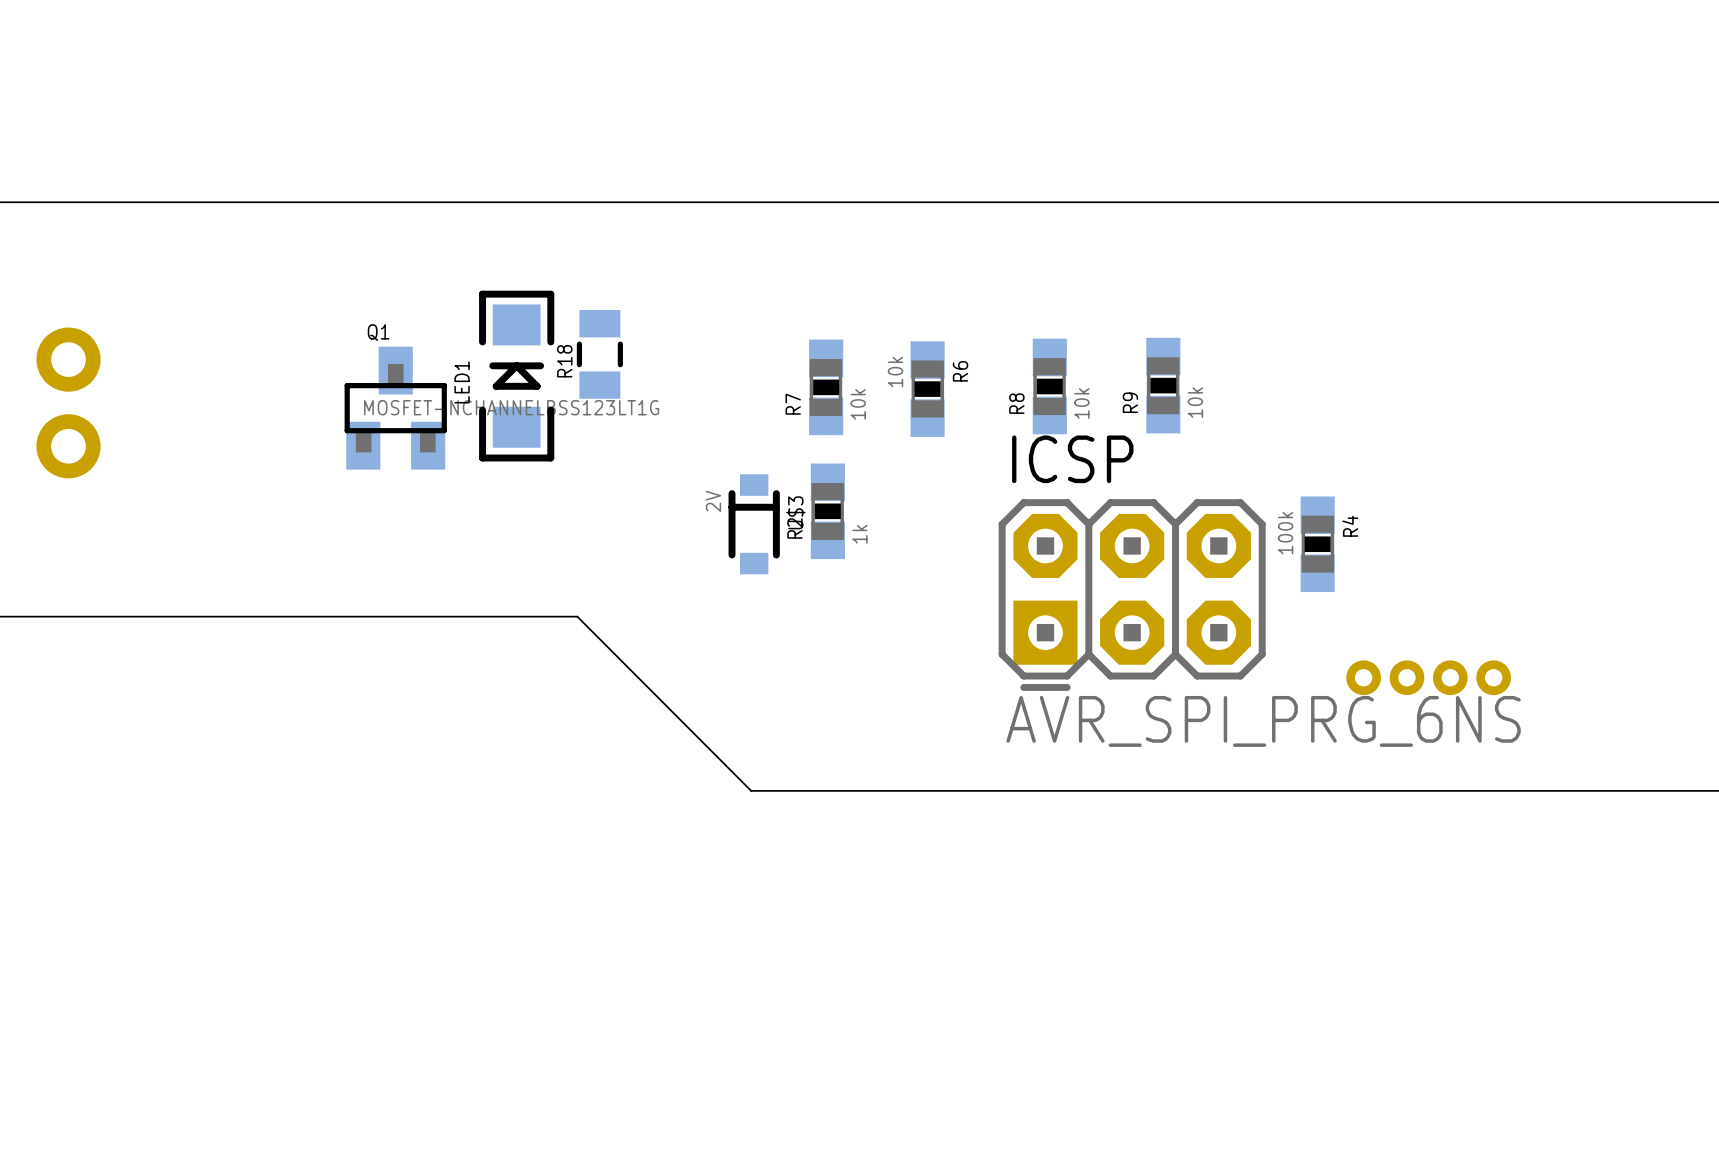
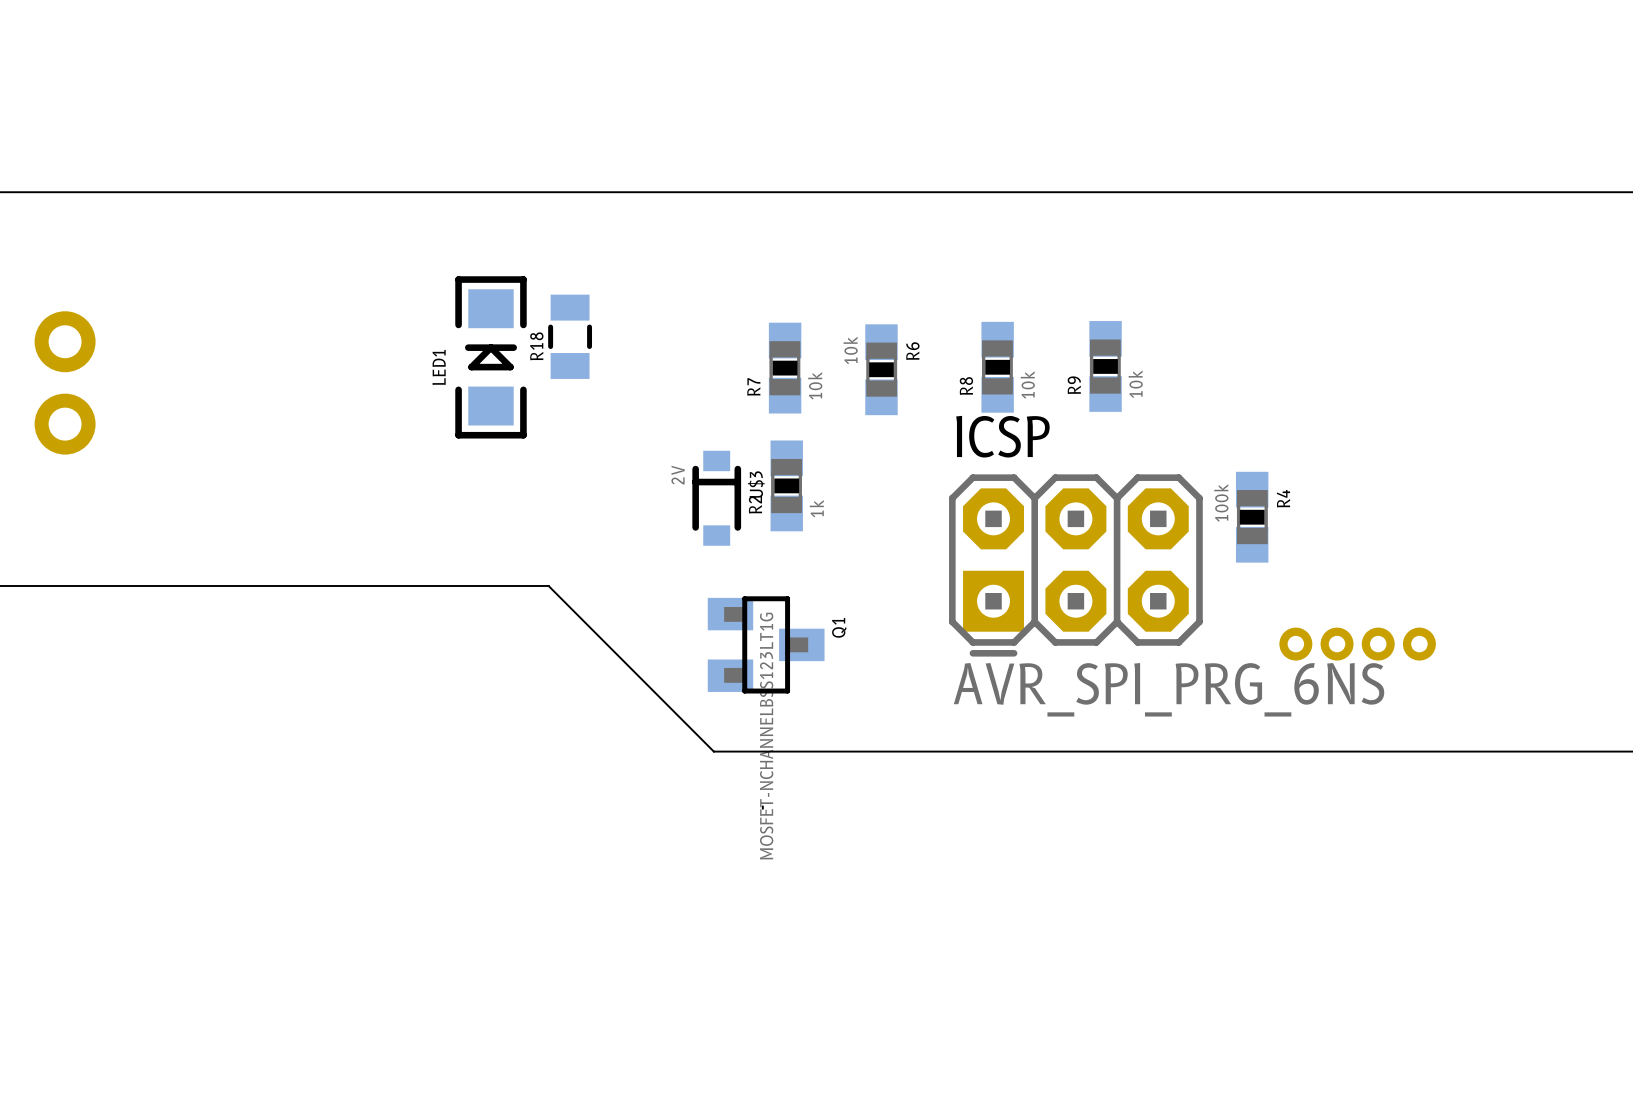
Q1 rotation: 0° (395, 408) -> 90° clockwise (766, 644)
Q1 position: (395, 408) -> (766, 644)
board edge: none -> (762, 806) (762, 808)

